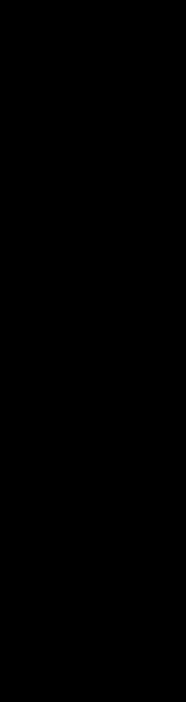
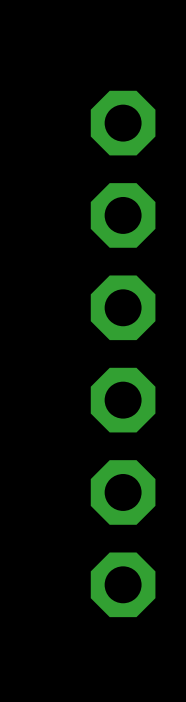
part: none -> (123, 353)

